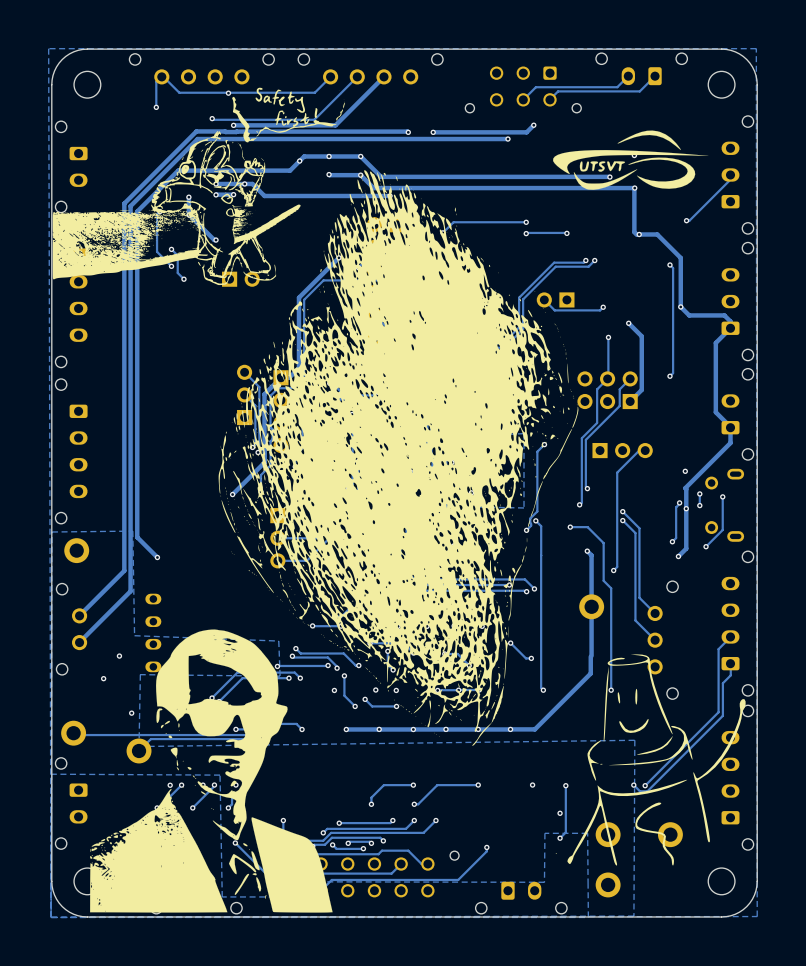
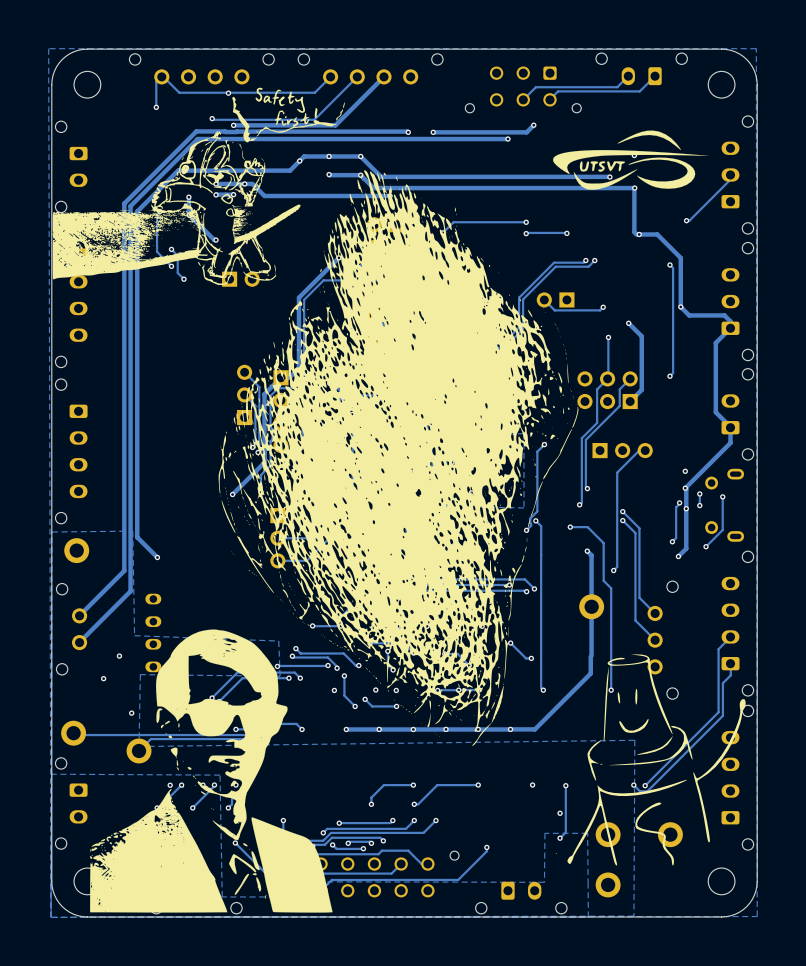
via: none -> (685, 488)

